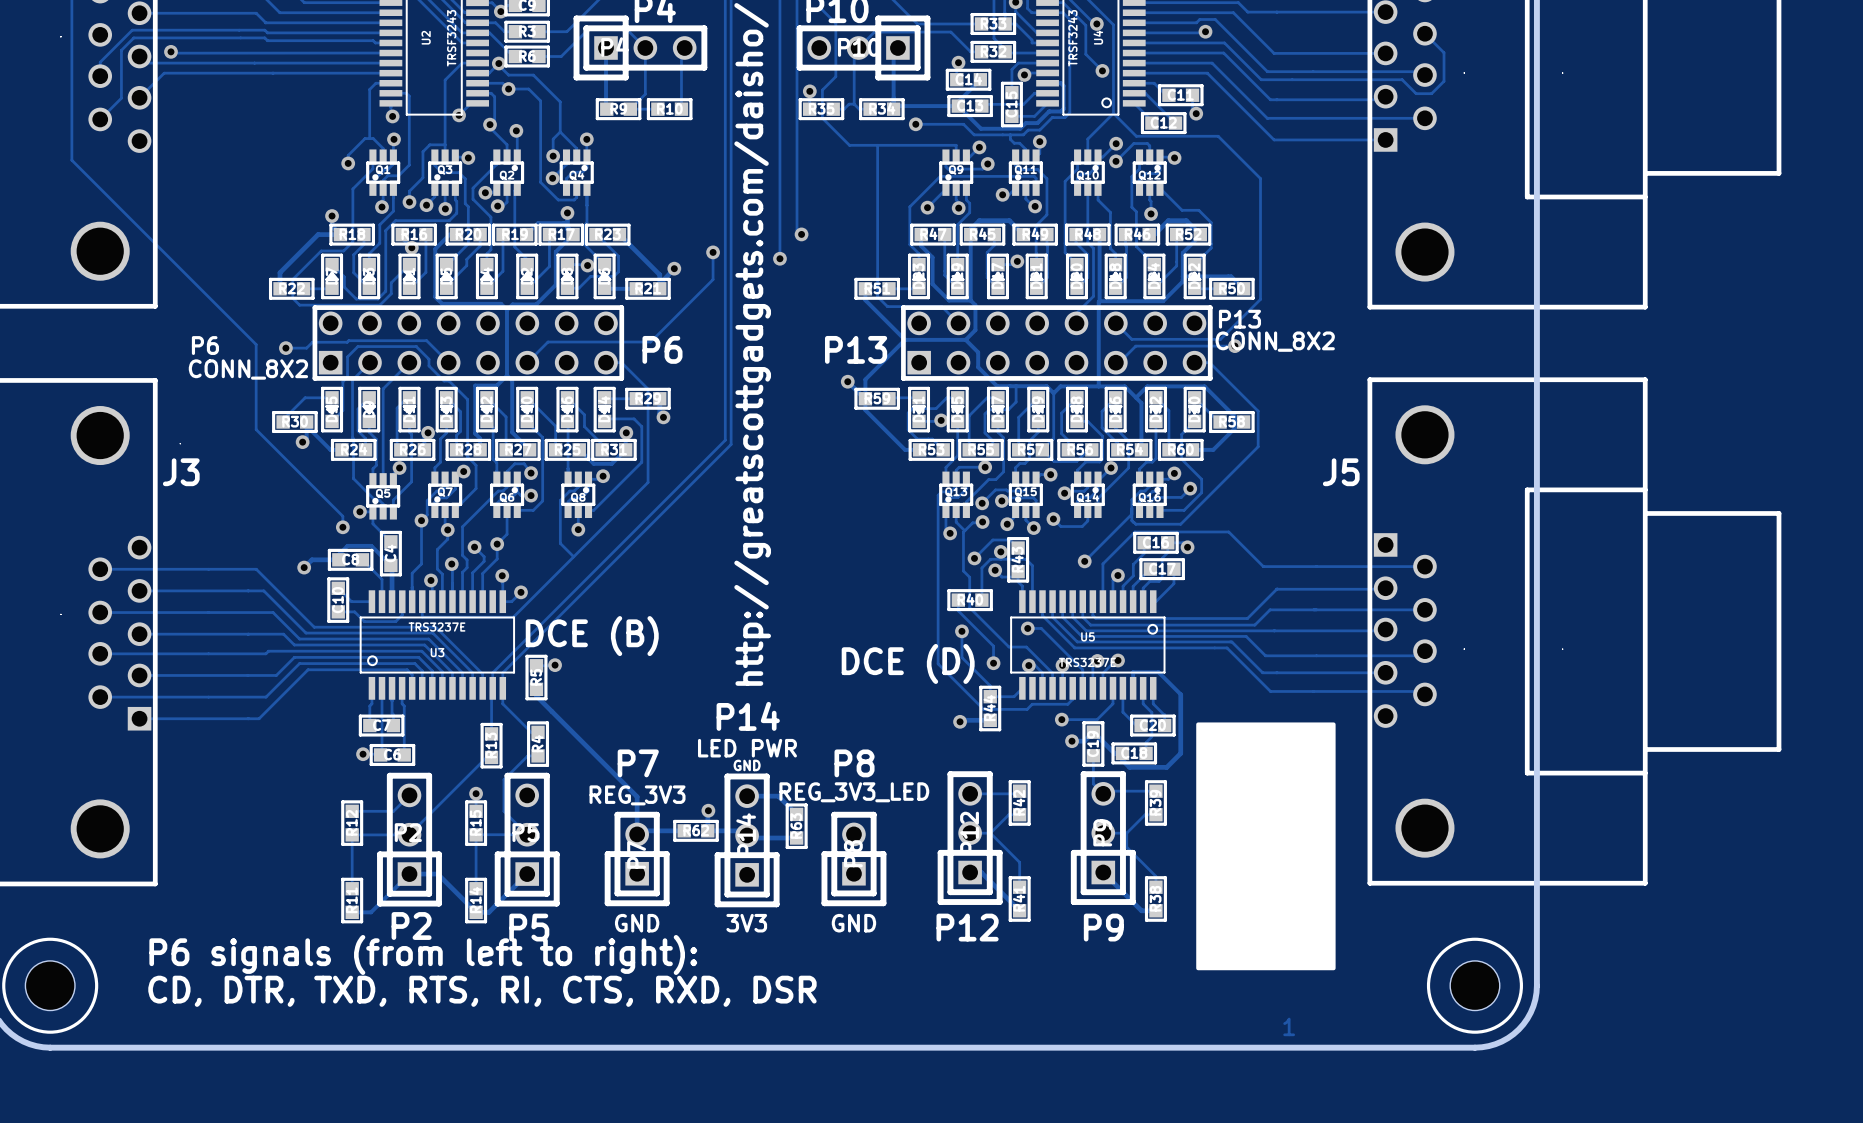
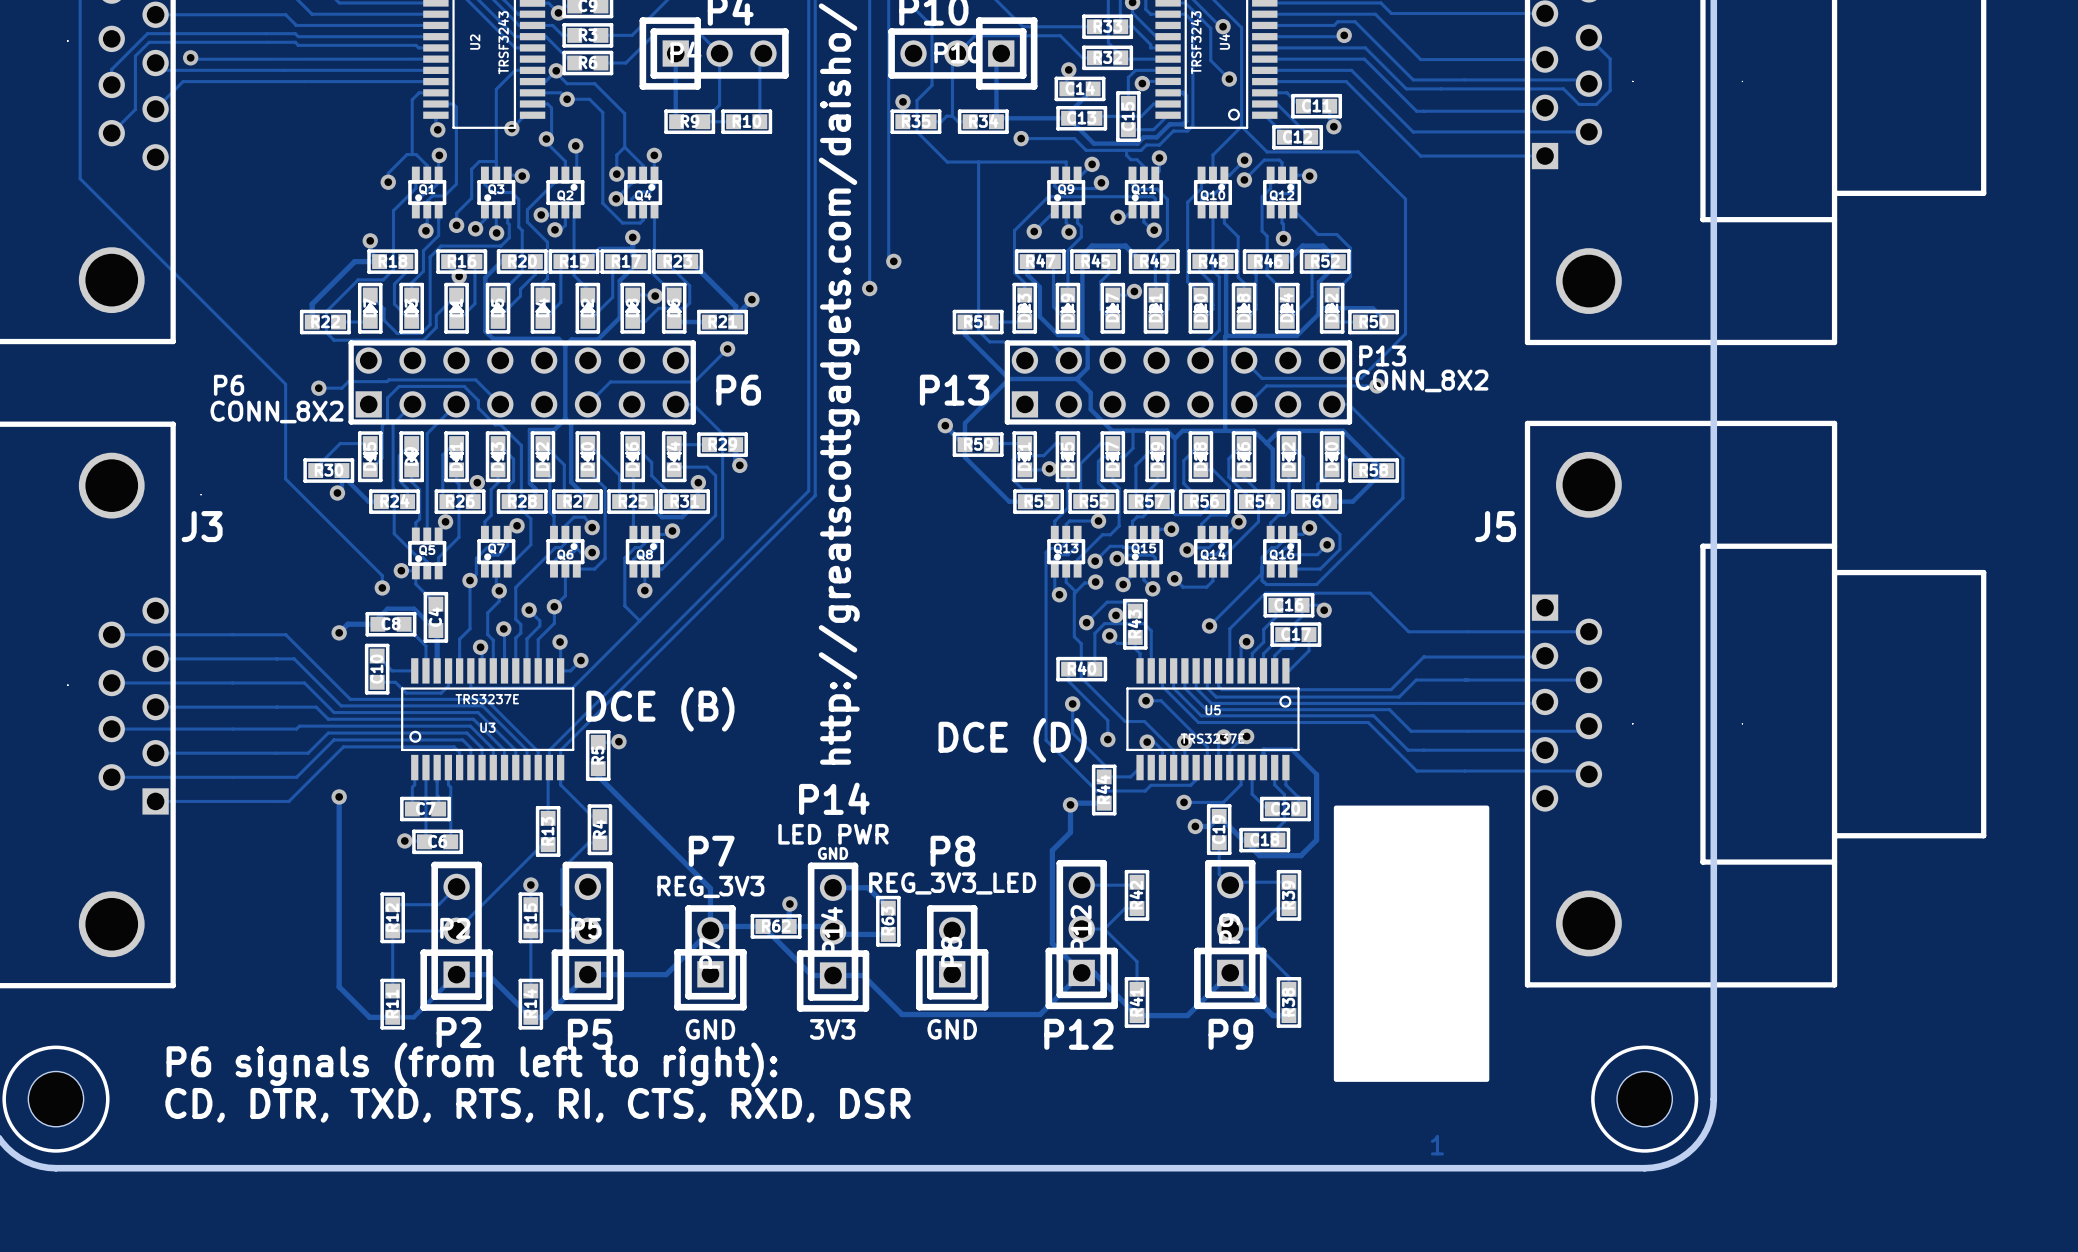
track: (713, 252) (713, 279) (650, 342) (547, 342) -> (727, 348) (694, 381) (610, 381)
via position: (713, 252) -> (727, 348)
track: none -> (339, 796) (339, 986) (369, 1017) (392, 1017)
via: none -> (339, 796)
track: none -> (1070, 804) (1070, 832) (1052, 850) (1052, 943) (1081, 972) (1040, 1014) (902, 1014) (863, 975) (811, 975) (762, 926)
track: none -> (710, 930) (666, 974) (587, 974)
track: none -> (1230, 972) (1187, 1015) (1136, 1015)

